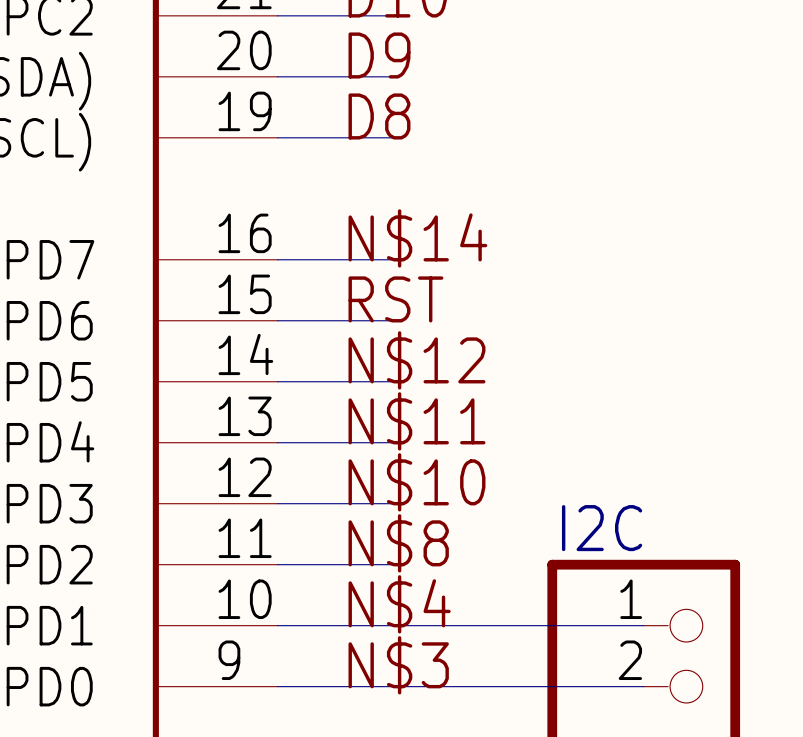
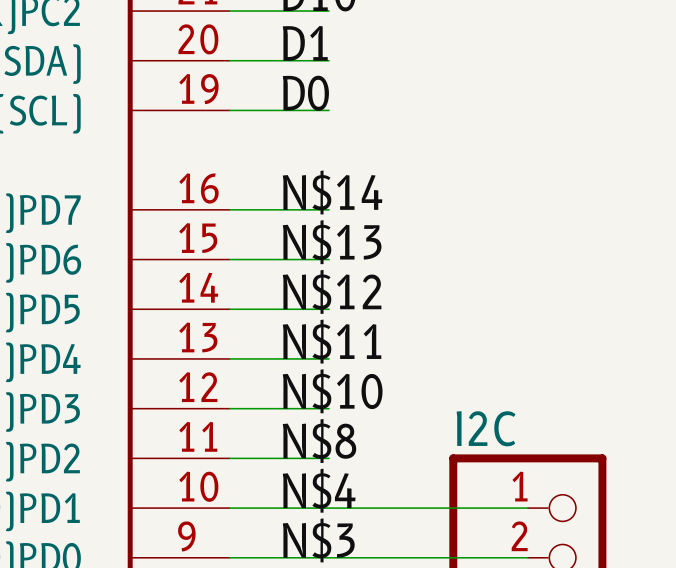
label: D9 (379, 55) -> D1 (305, 43)
label: D8 (379, 116) -> D0 (305, 93)
label: RST (395, 299) -> N$13 (332, 242)

